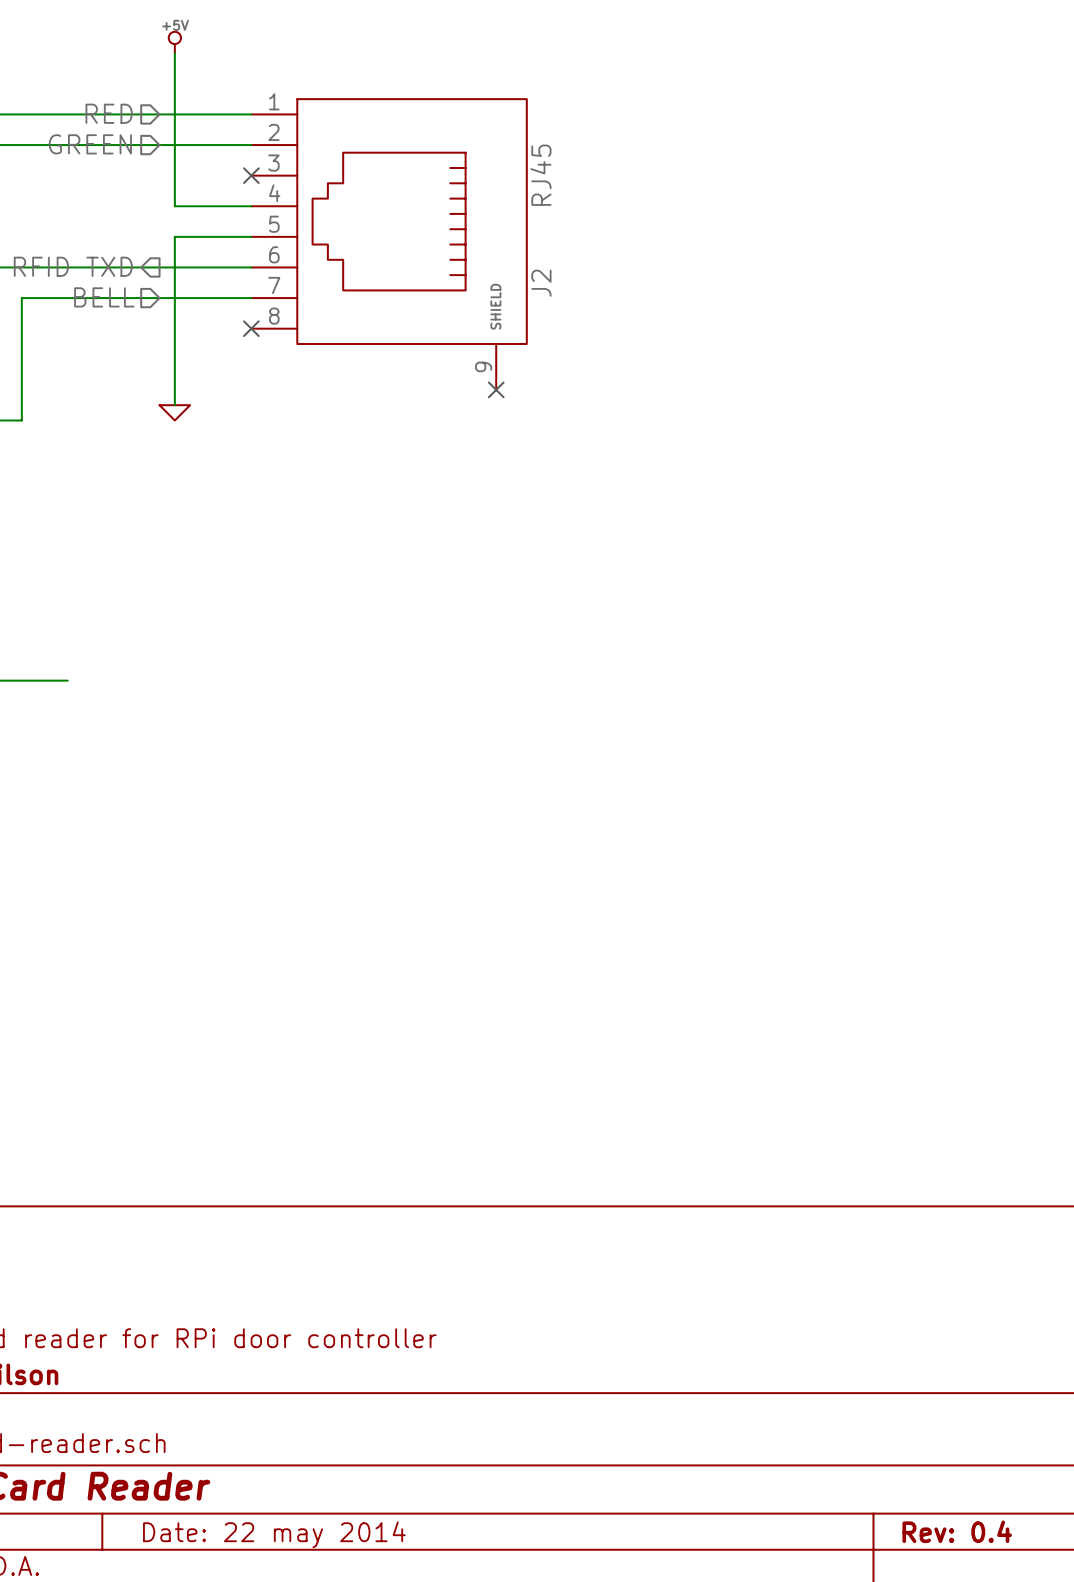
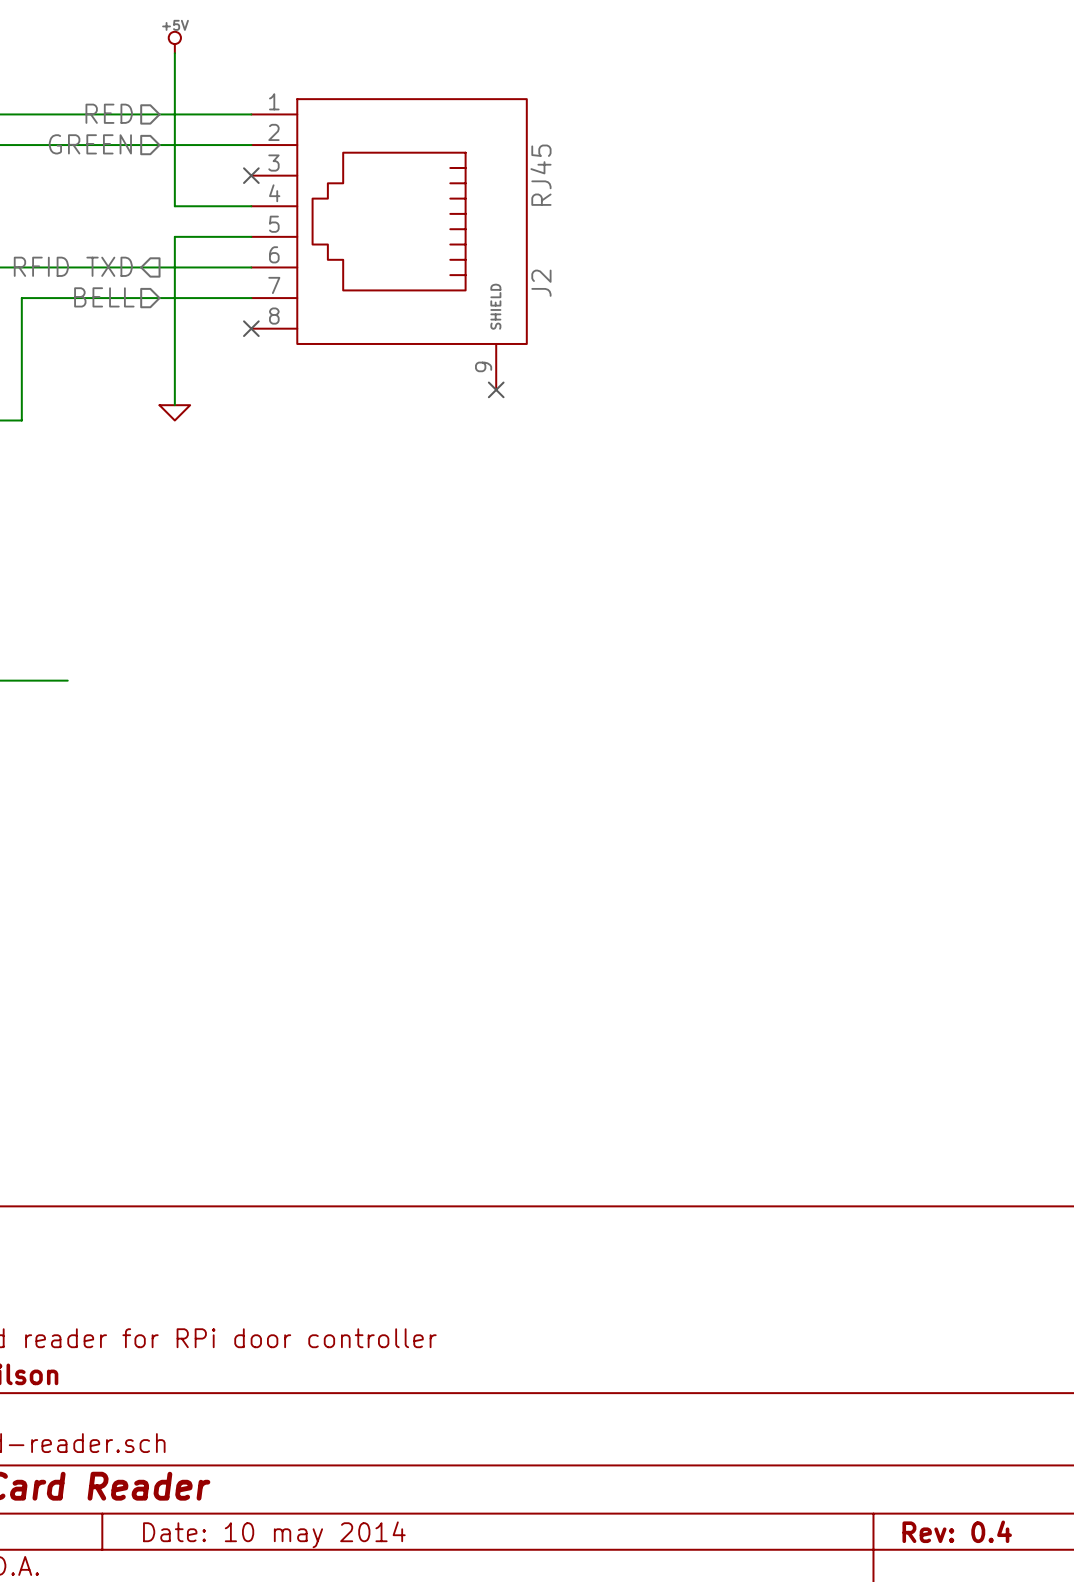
title block: Date: 22 may 2014 (274, 1534) -> Date: 10 may 2014 (274, 1534)

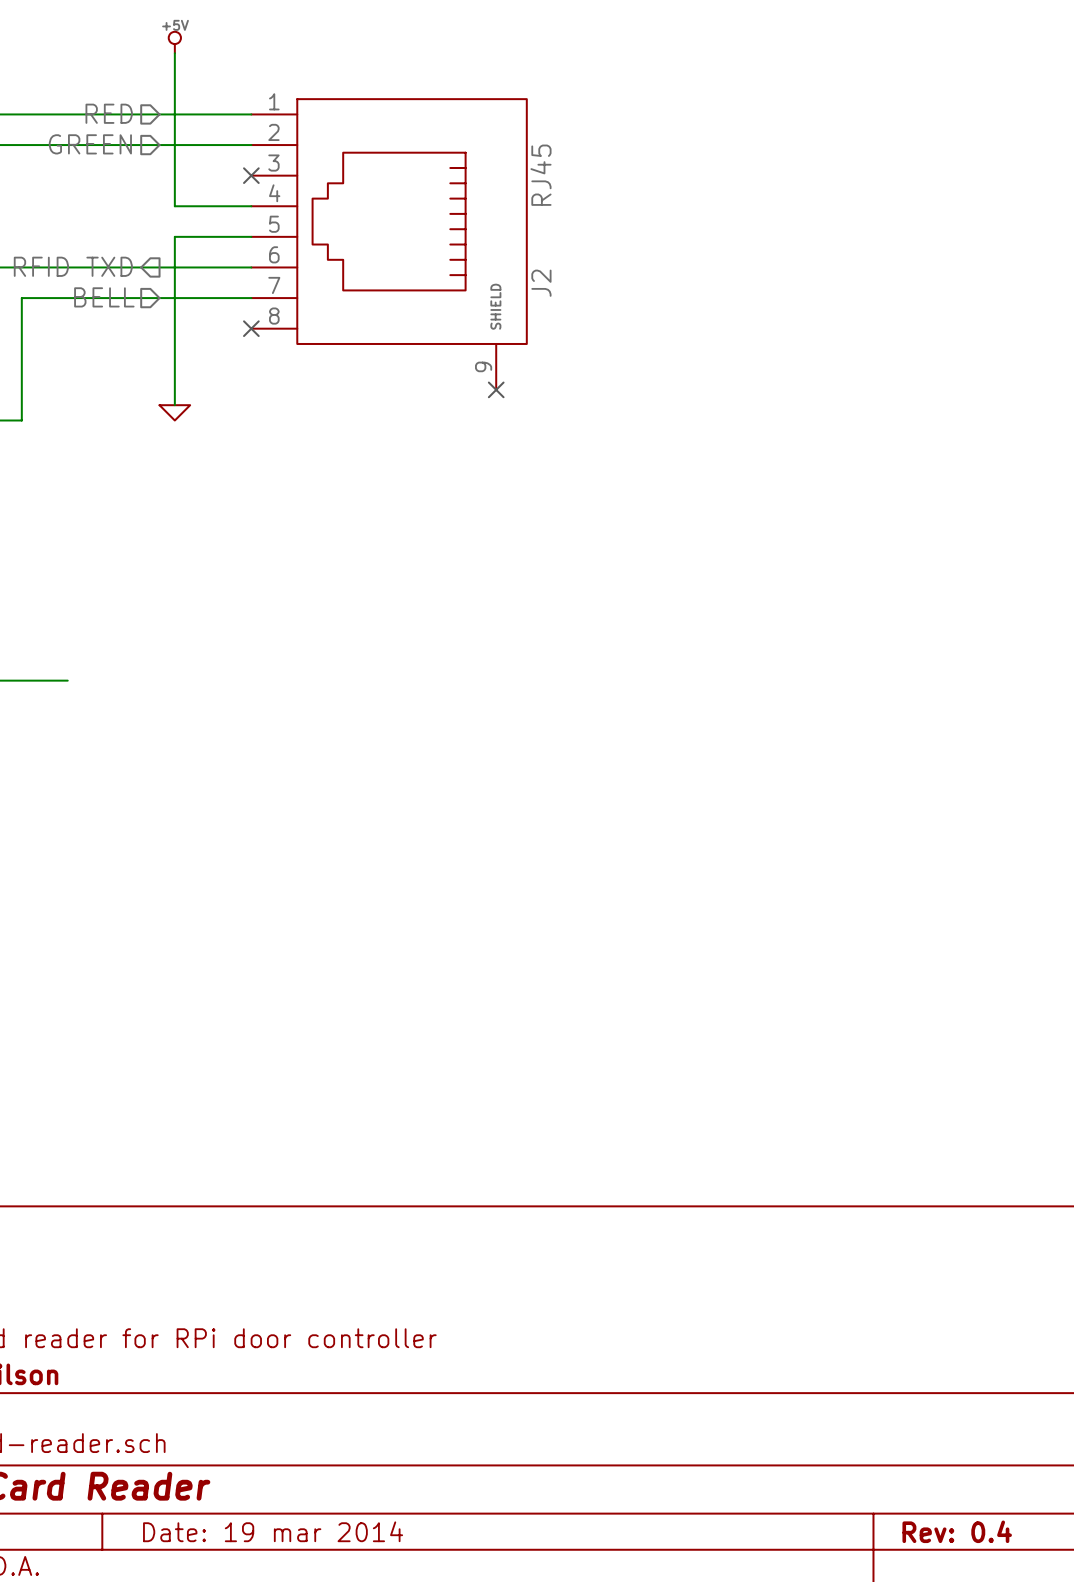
title block: Date: 10 may 2014 (274, 1534) -> Date: 19 mar 2014 (273, 1531)

